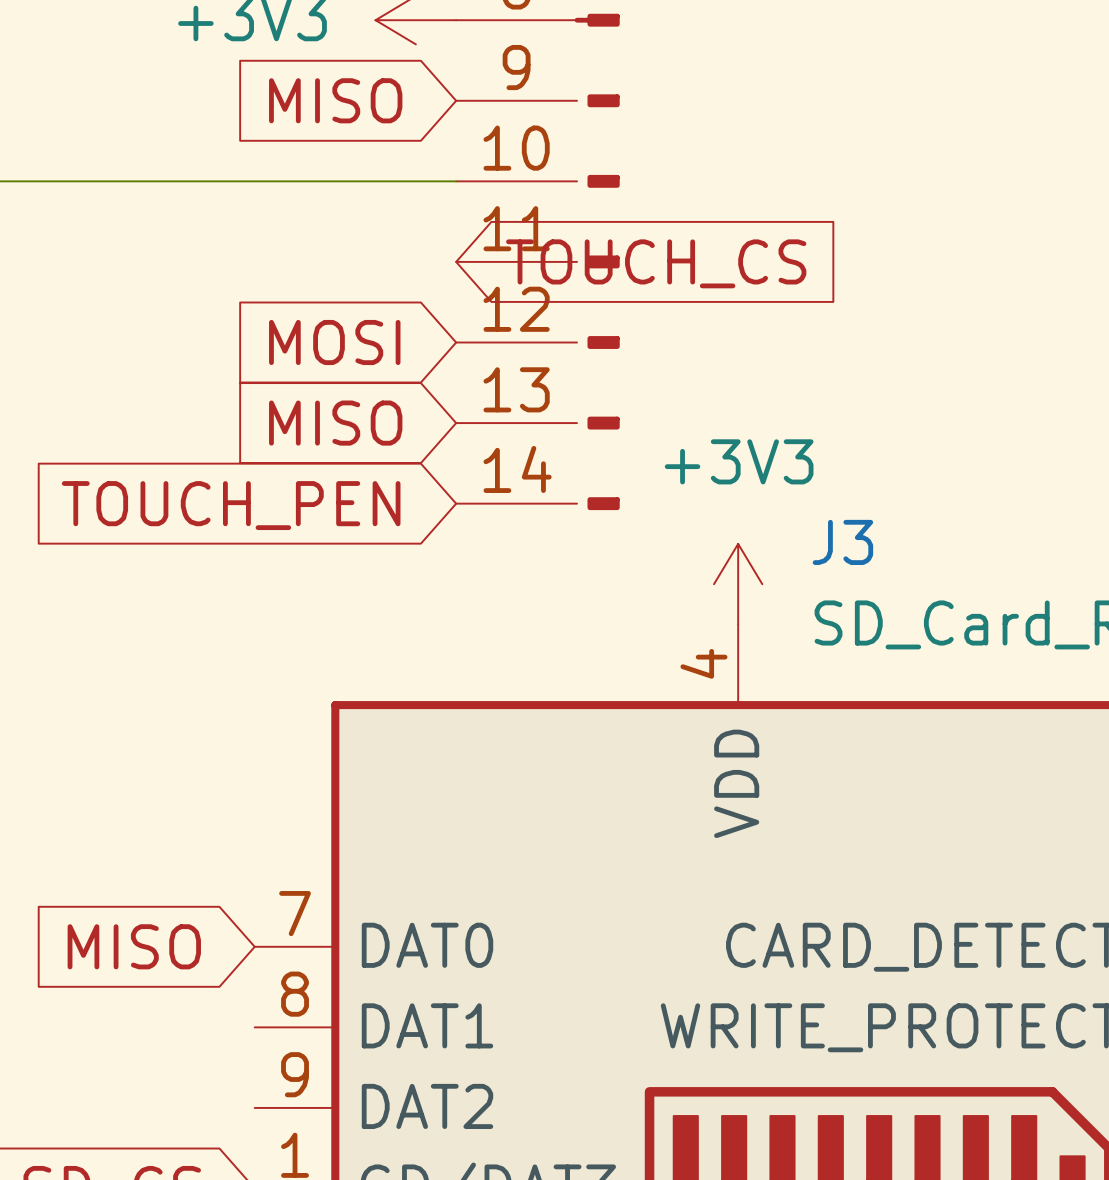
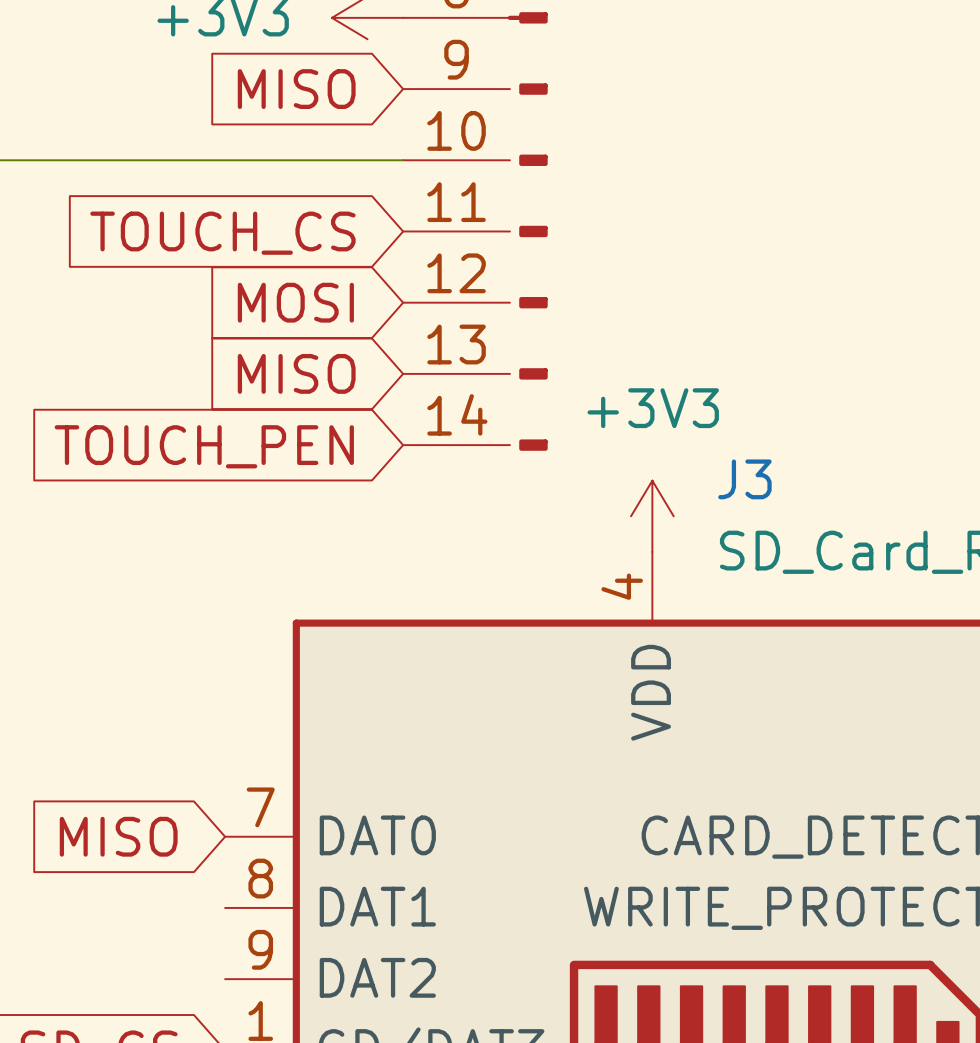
global label rotation: 0° (656, 263) -> 180° (222, 233)

